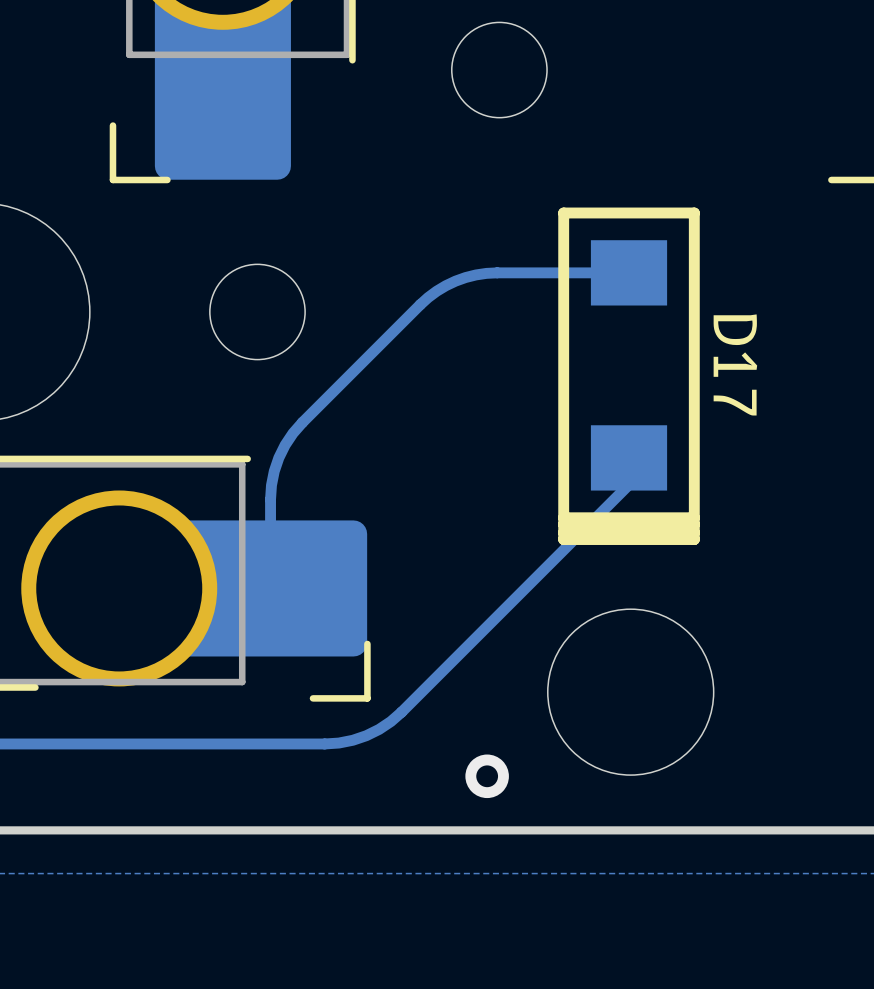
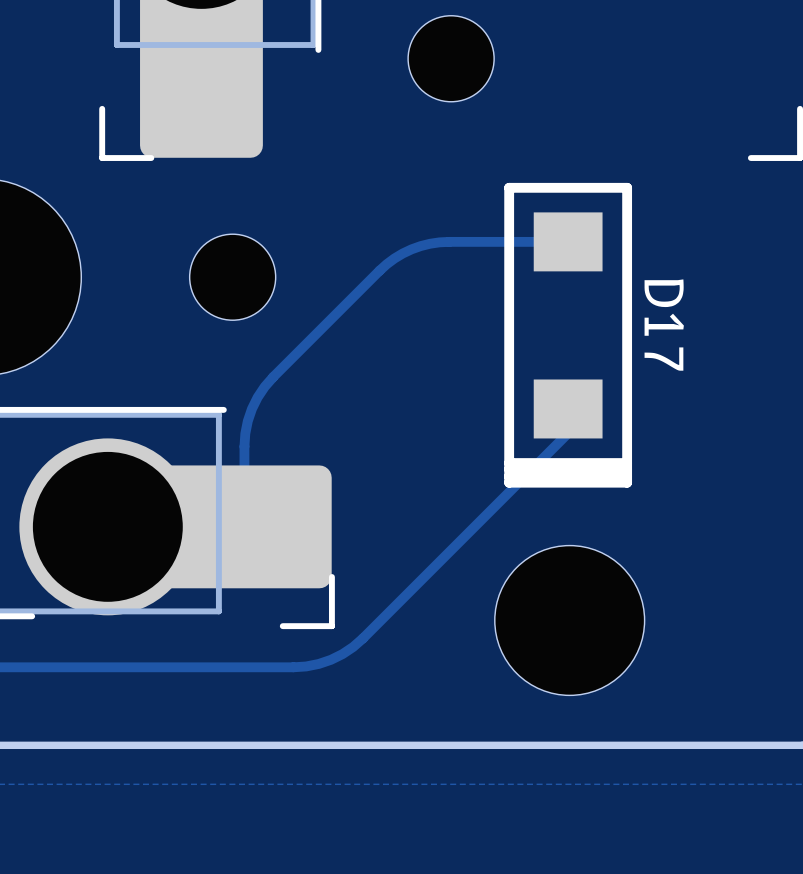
via: (487, 776) -> none

